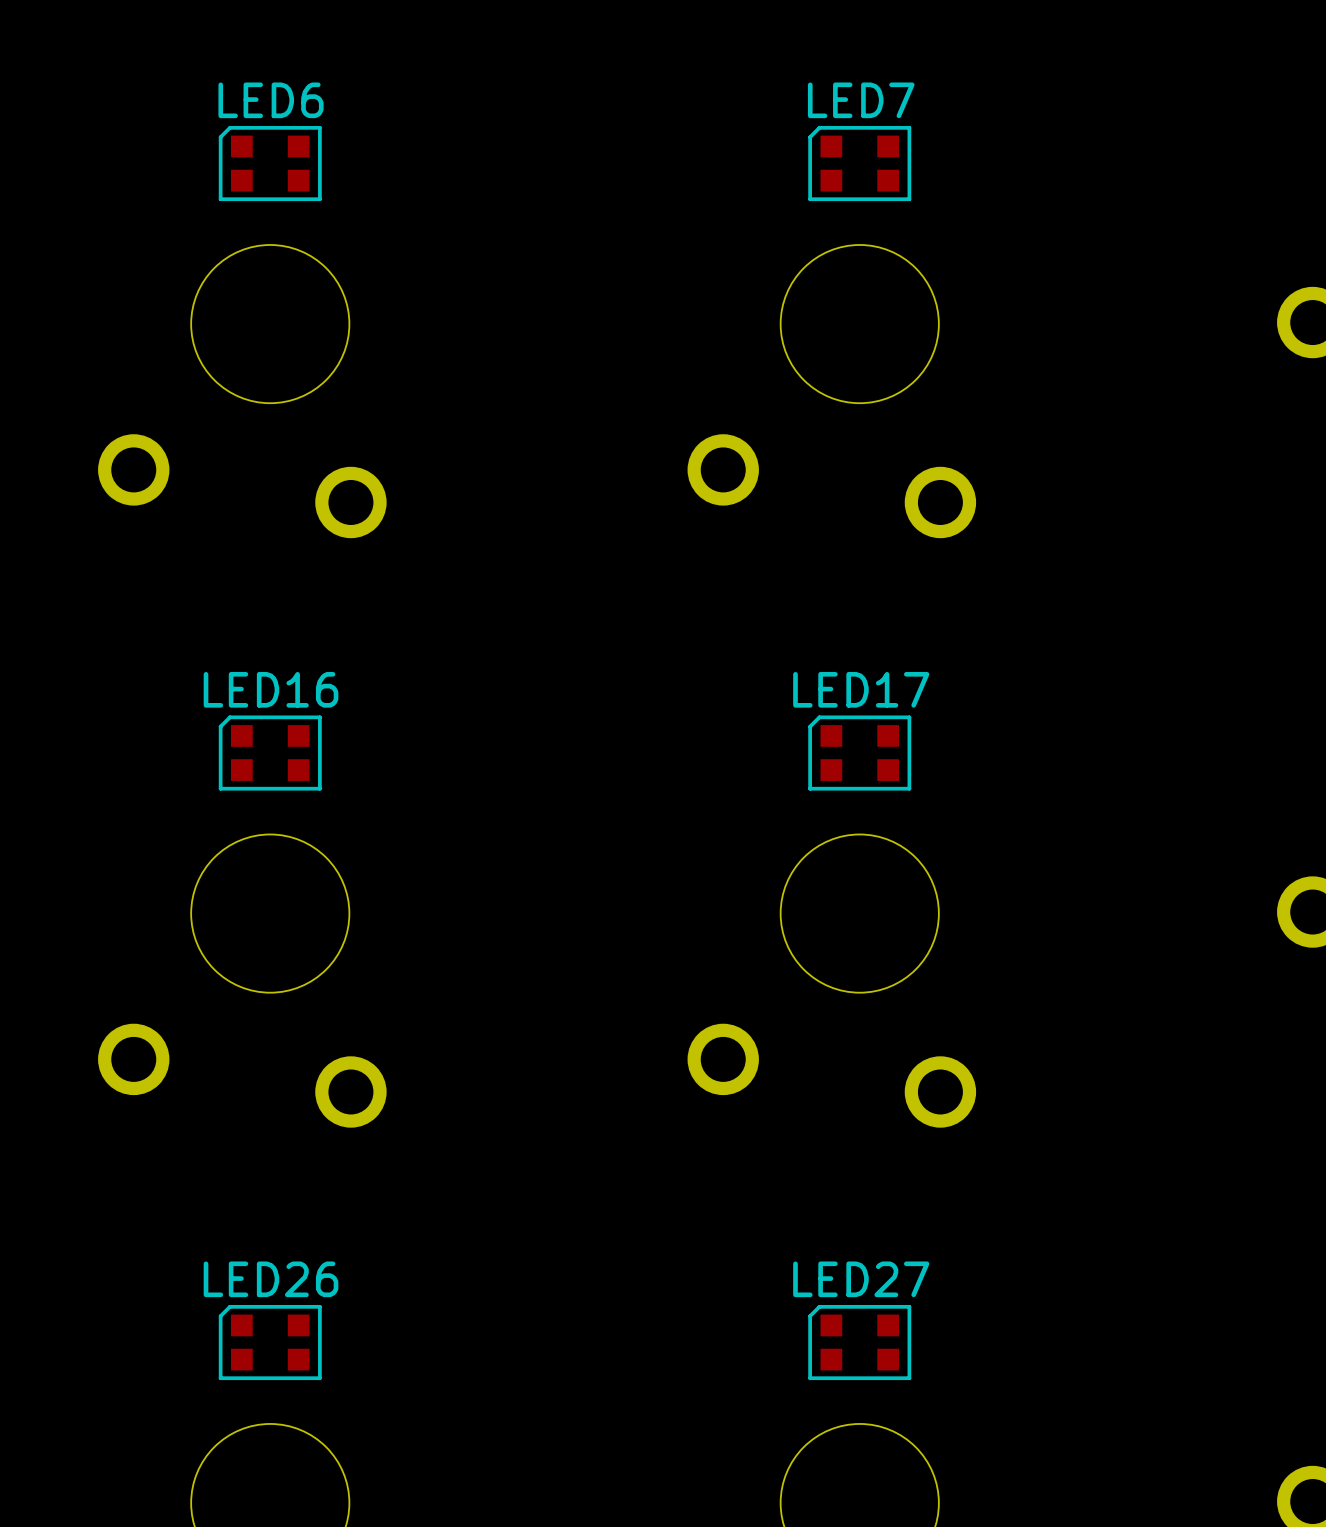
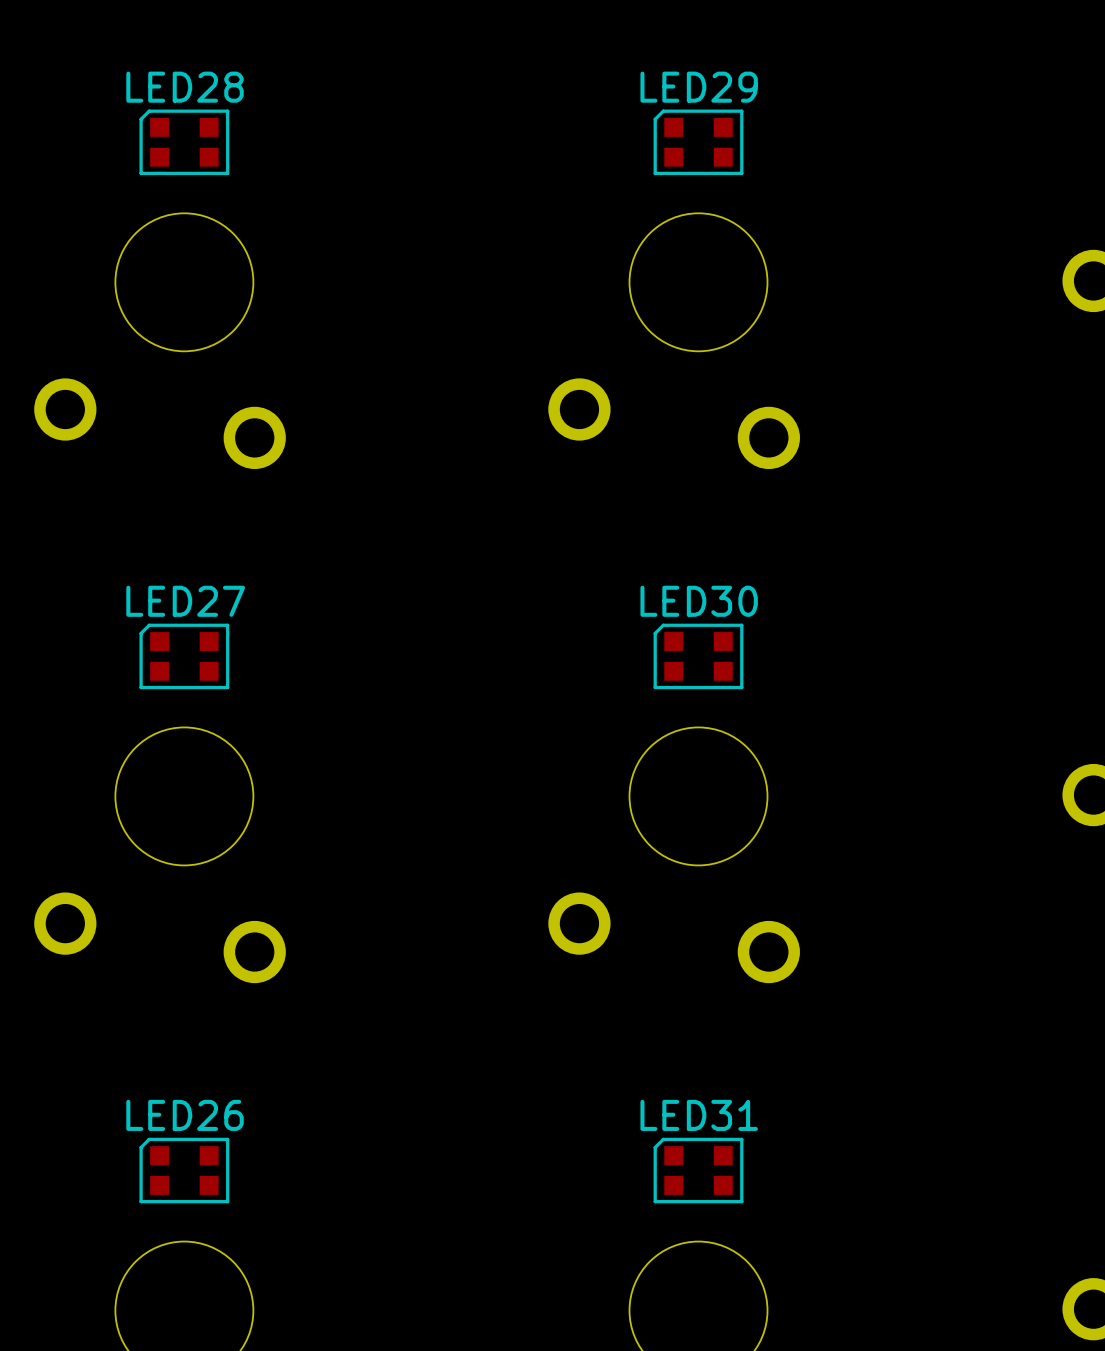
LED6 name: LED6 (271, 100) -> LED28 (185, 87)
LED7 name: LED7 (861, 100) -> LED29 (699, 87)
LED16 name: LED16 (271, 689) -> LED27 (185, 601)
LED17 name: LED17 (861, 689) -> LED30 (699, 601)
LED27 name: LED27 (861, 1279) -> LED31 (699, 1115)

